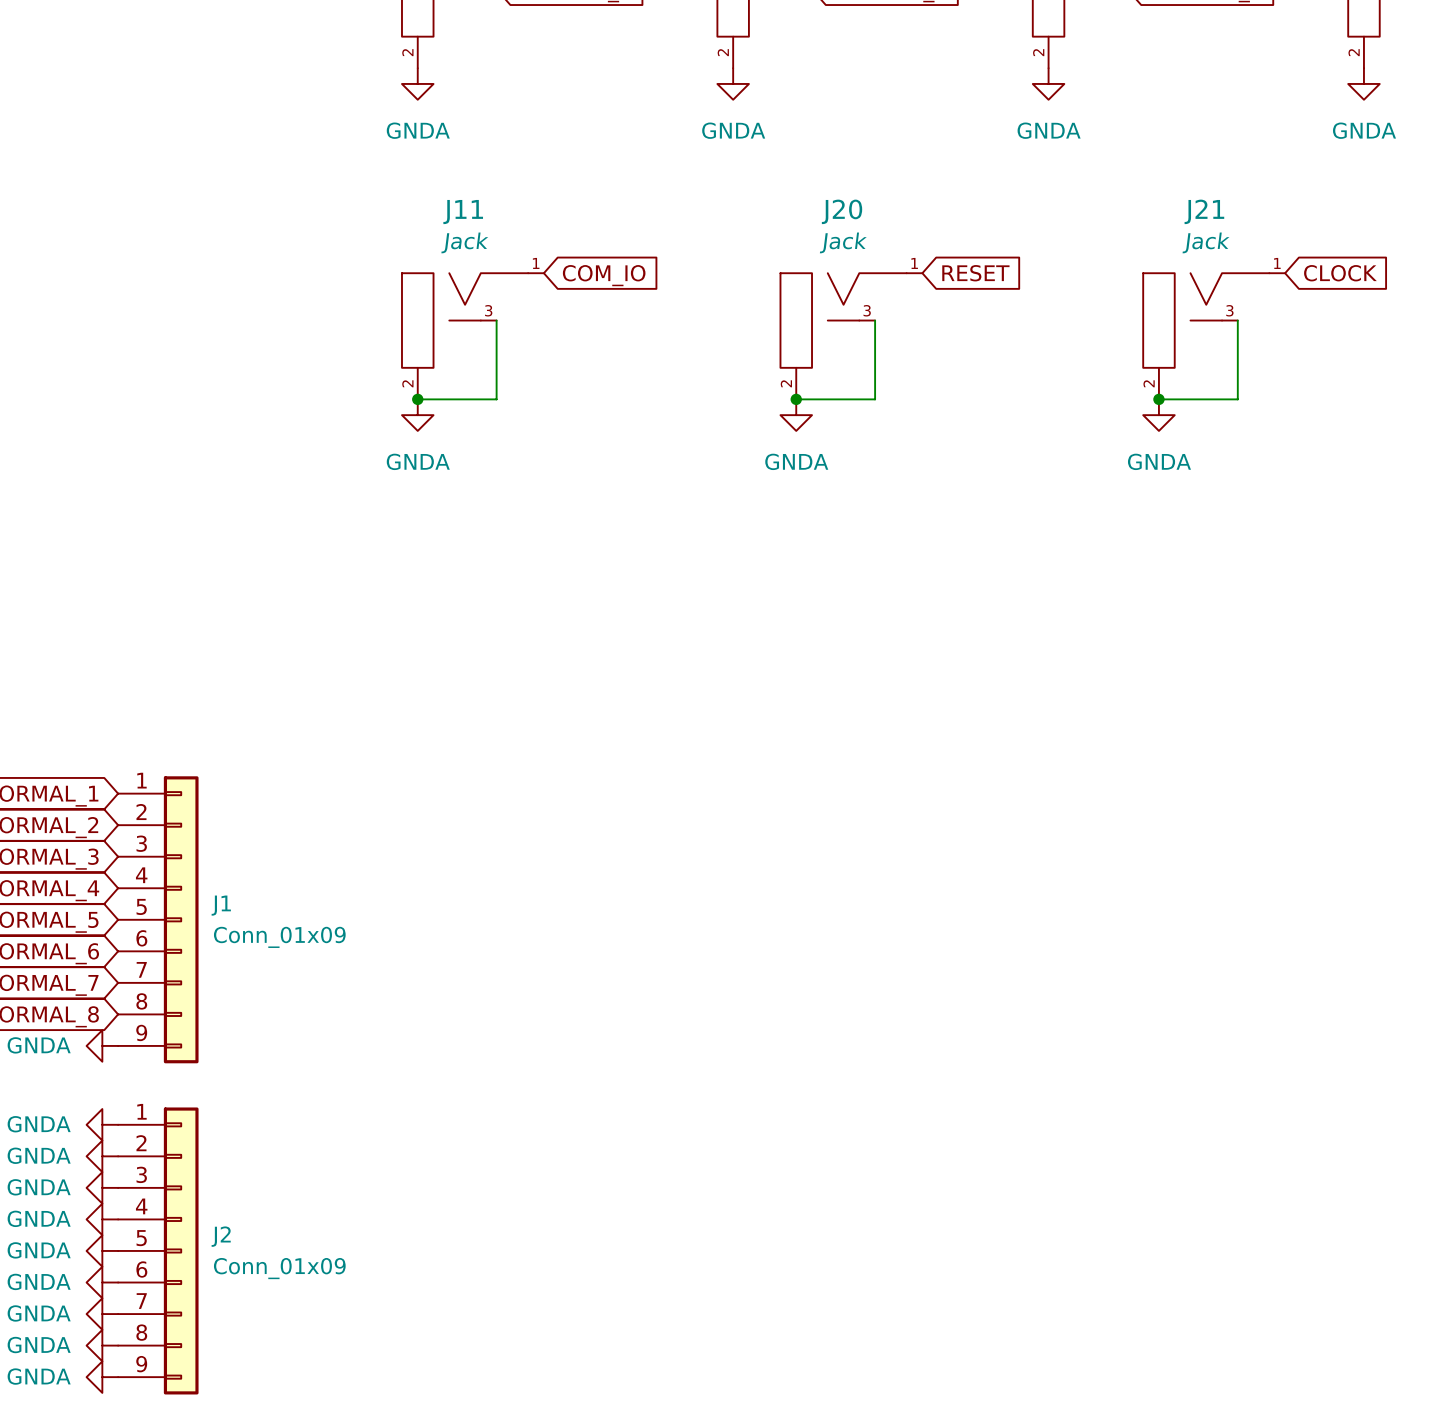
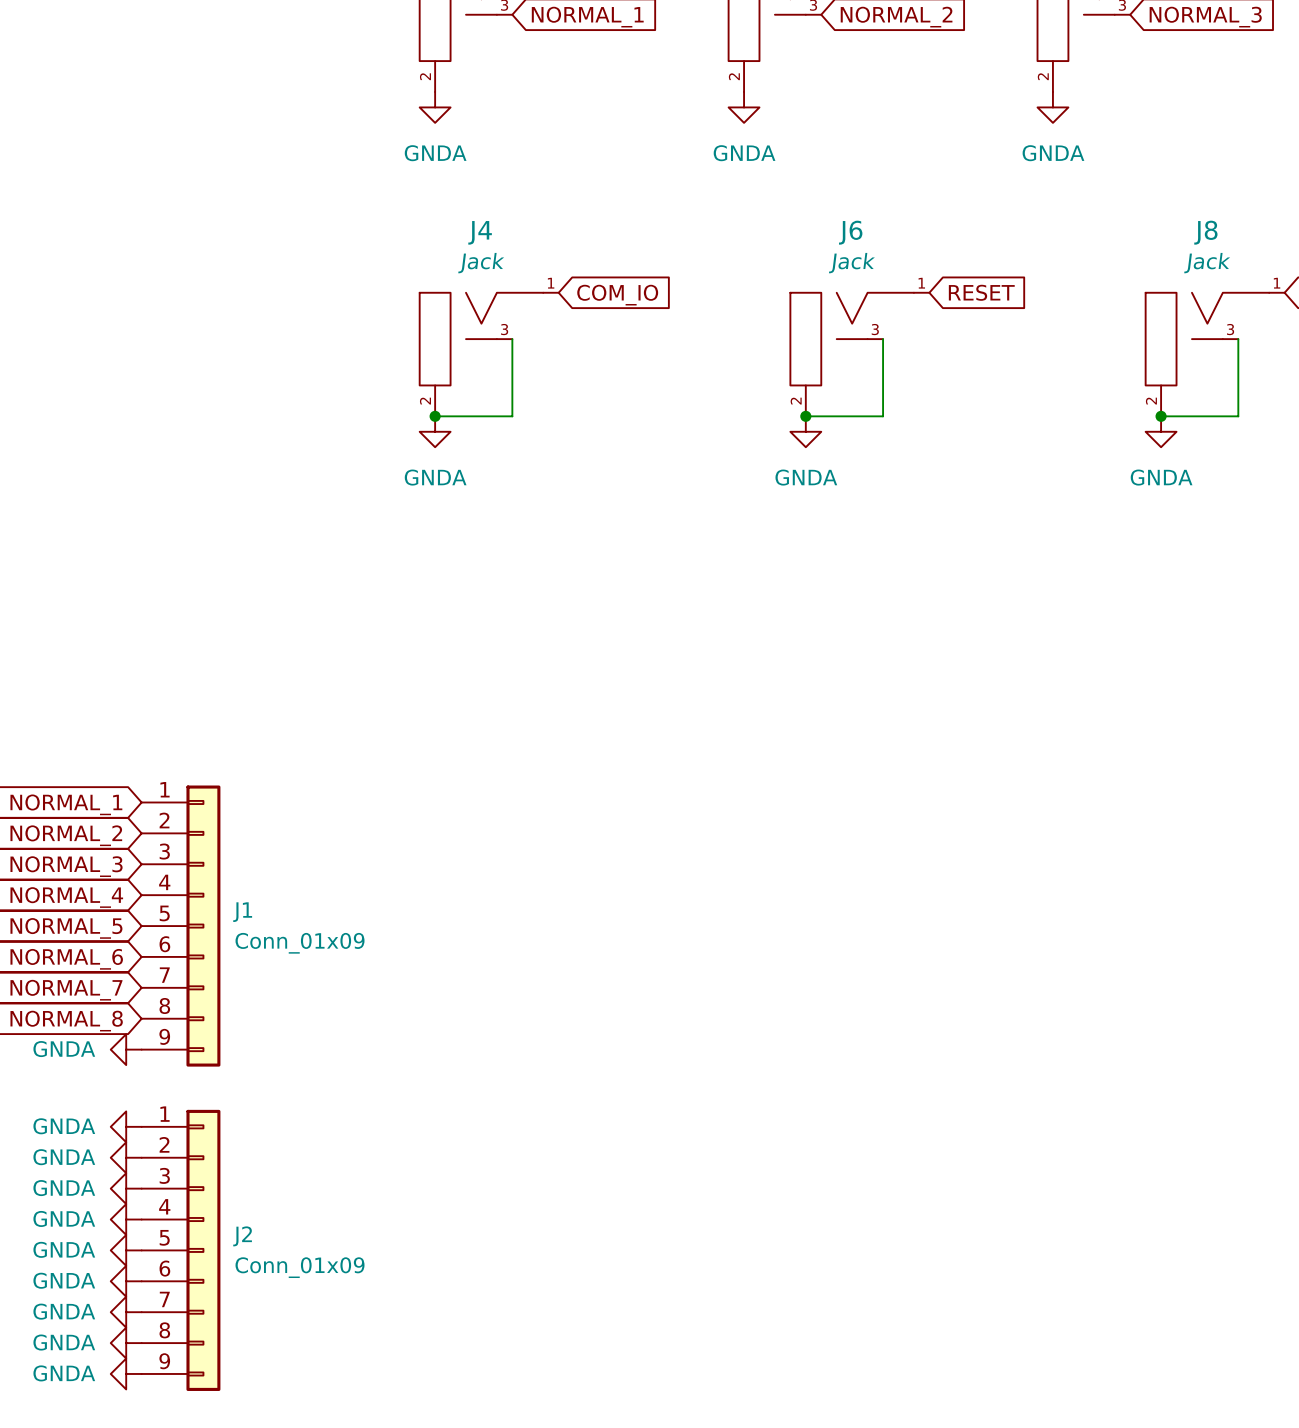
J20 name: J20 (842, 211) -> J6 (850, 232)
J21 name: J21 (1204, 211) -> J8 (1205, 232)
J11 name: J11 (463, 212) -> J4 (480, 232)

